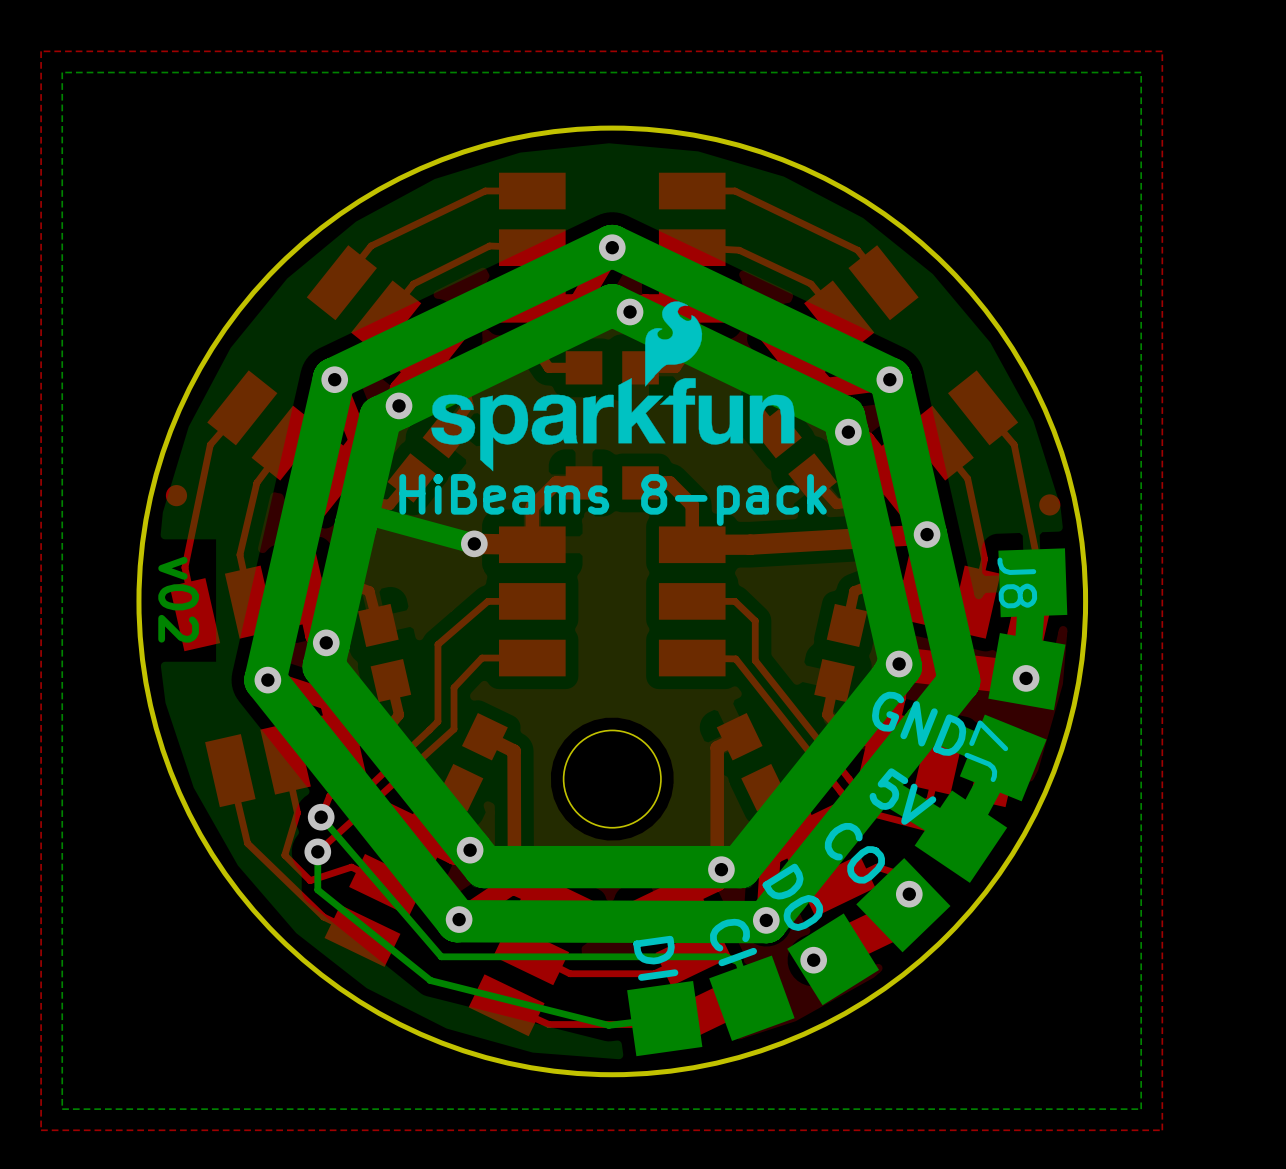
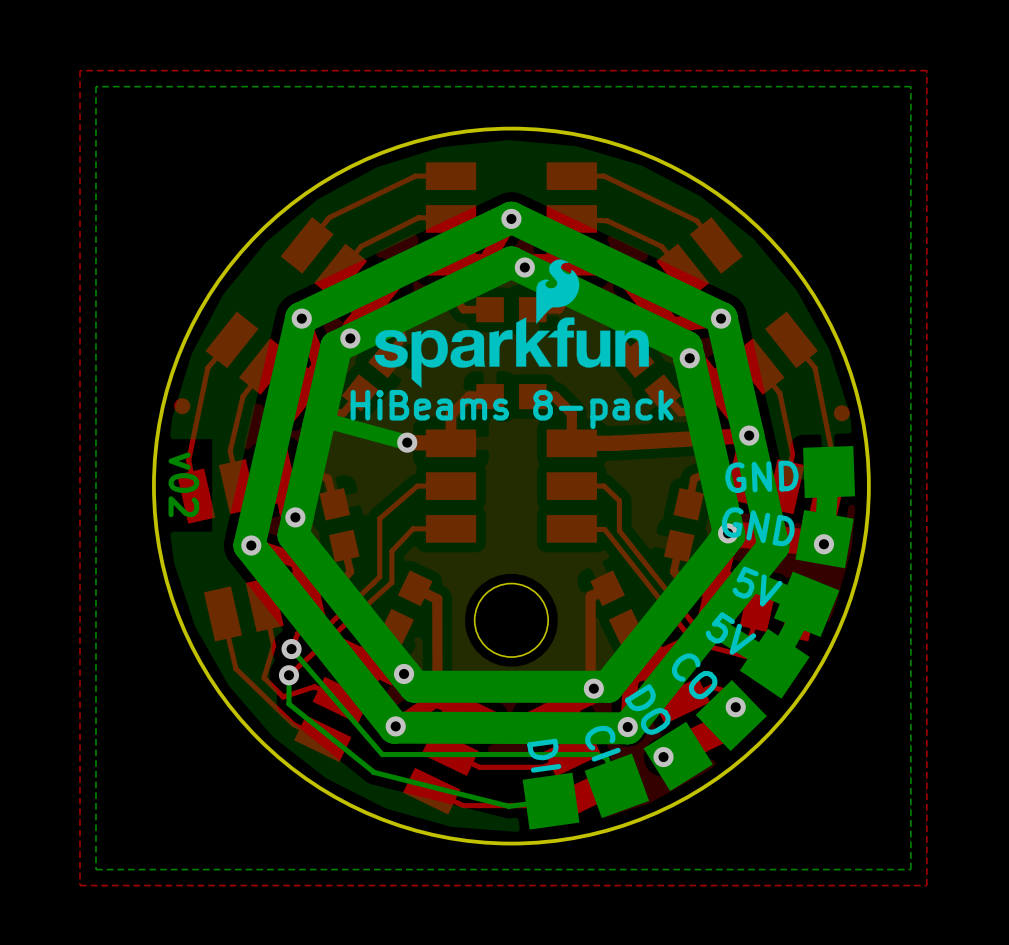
J8 name: J8 (1017, 583) -> none
text: none -> GND (761, 476)
text: none -> GND (758, 526)
text: GND (919, 723) -> 5V (757, 586)
J7 name: J7 (986, 751) -> none

